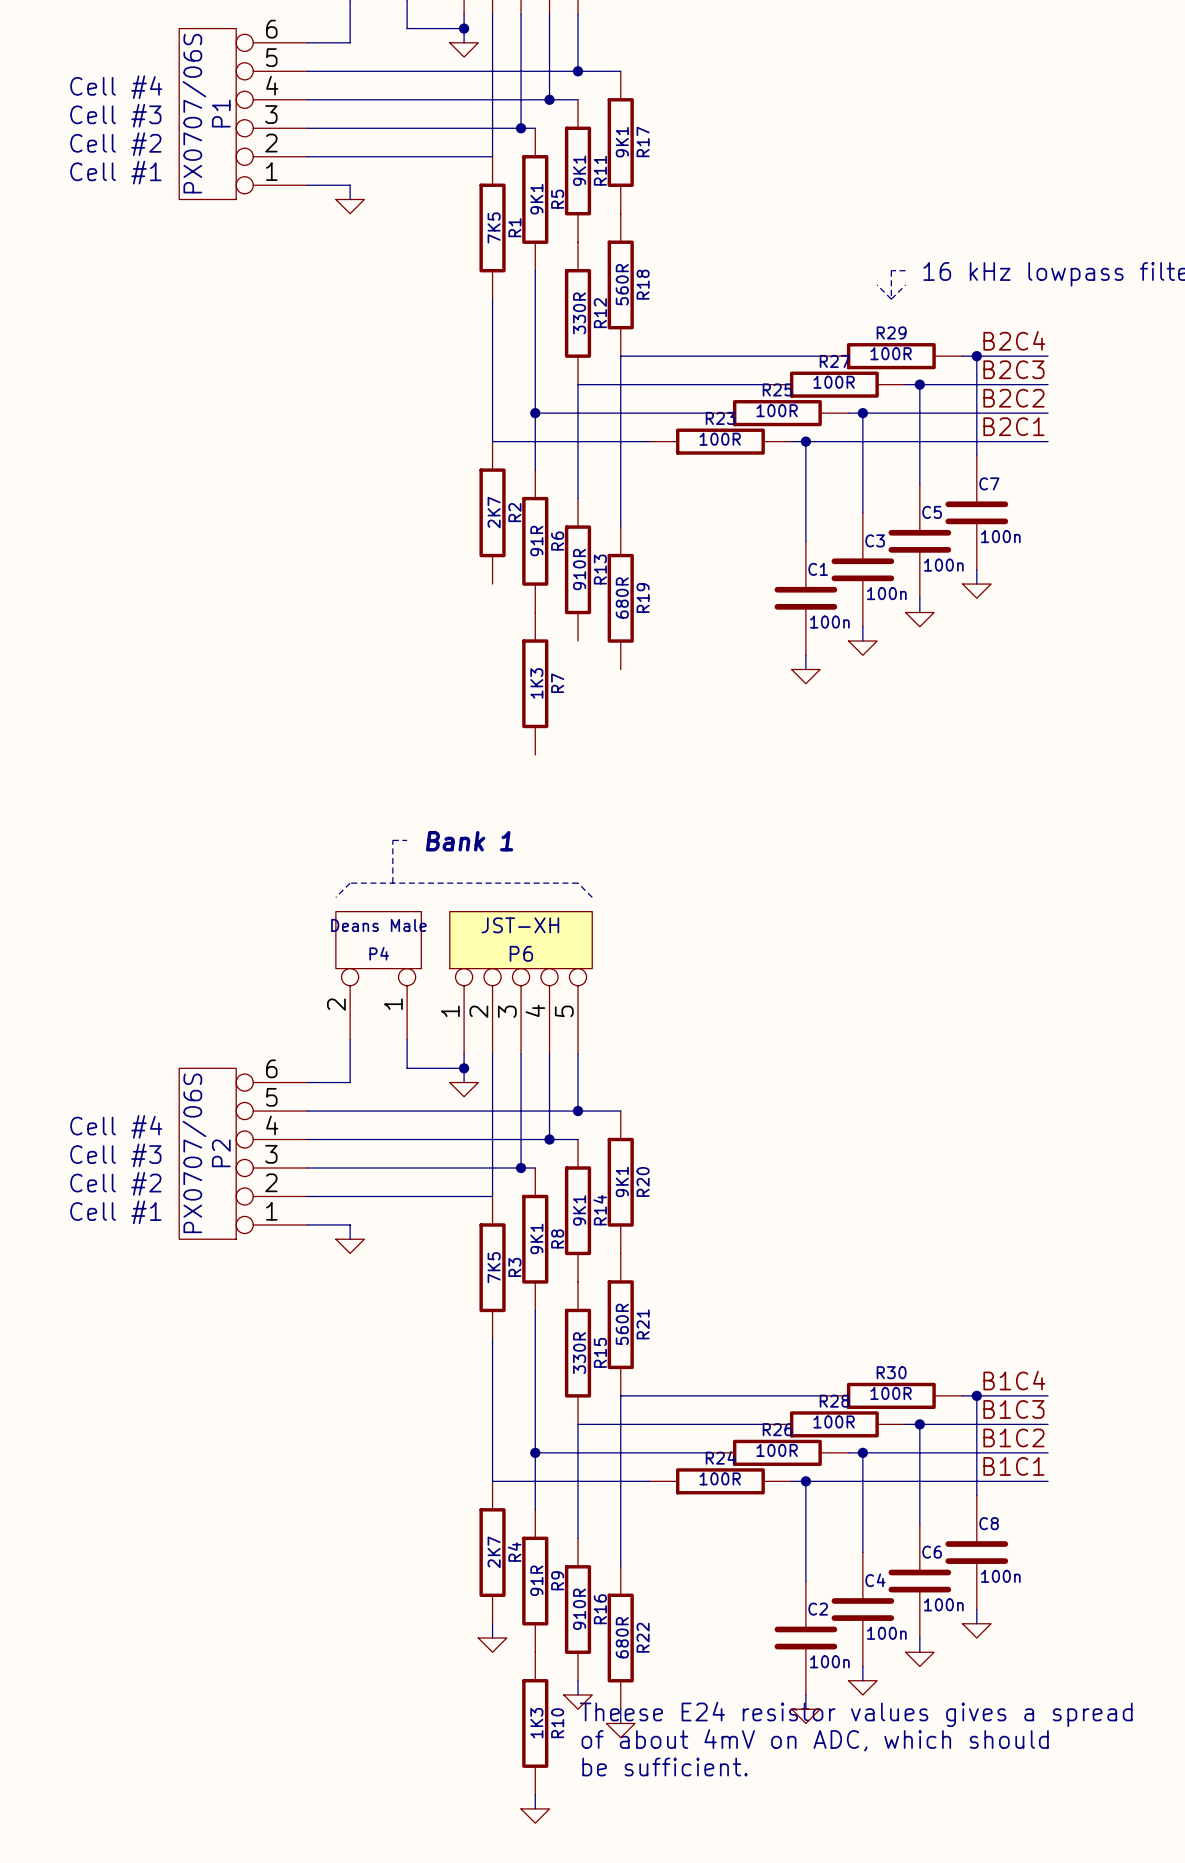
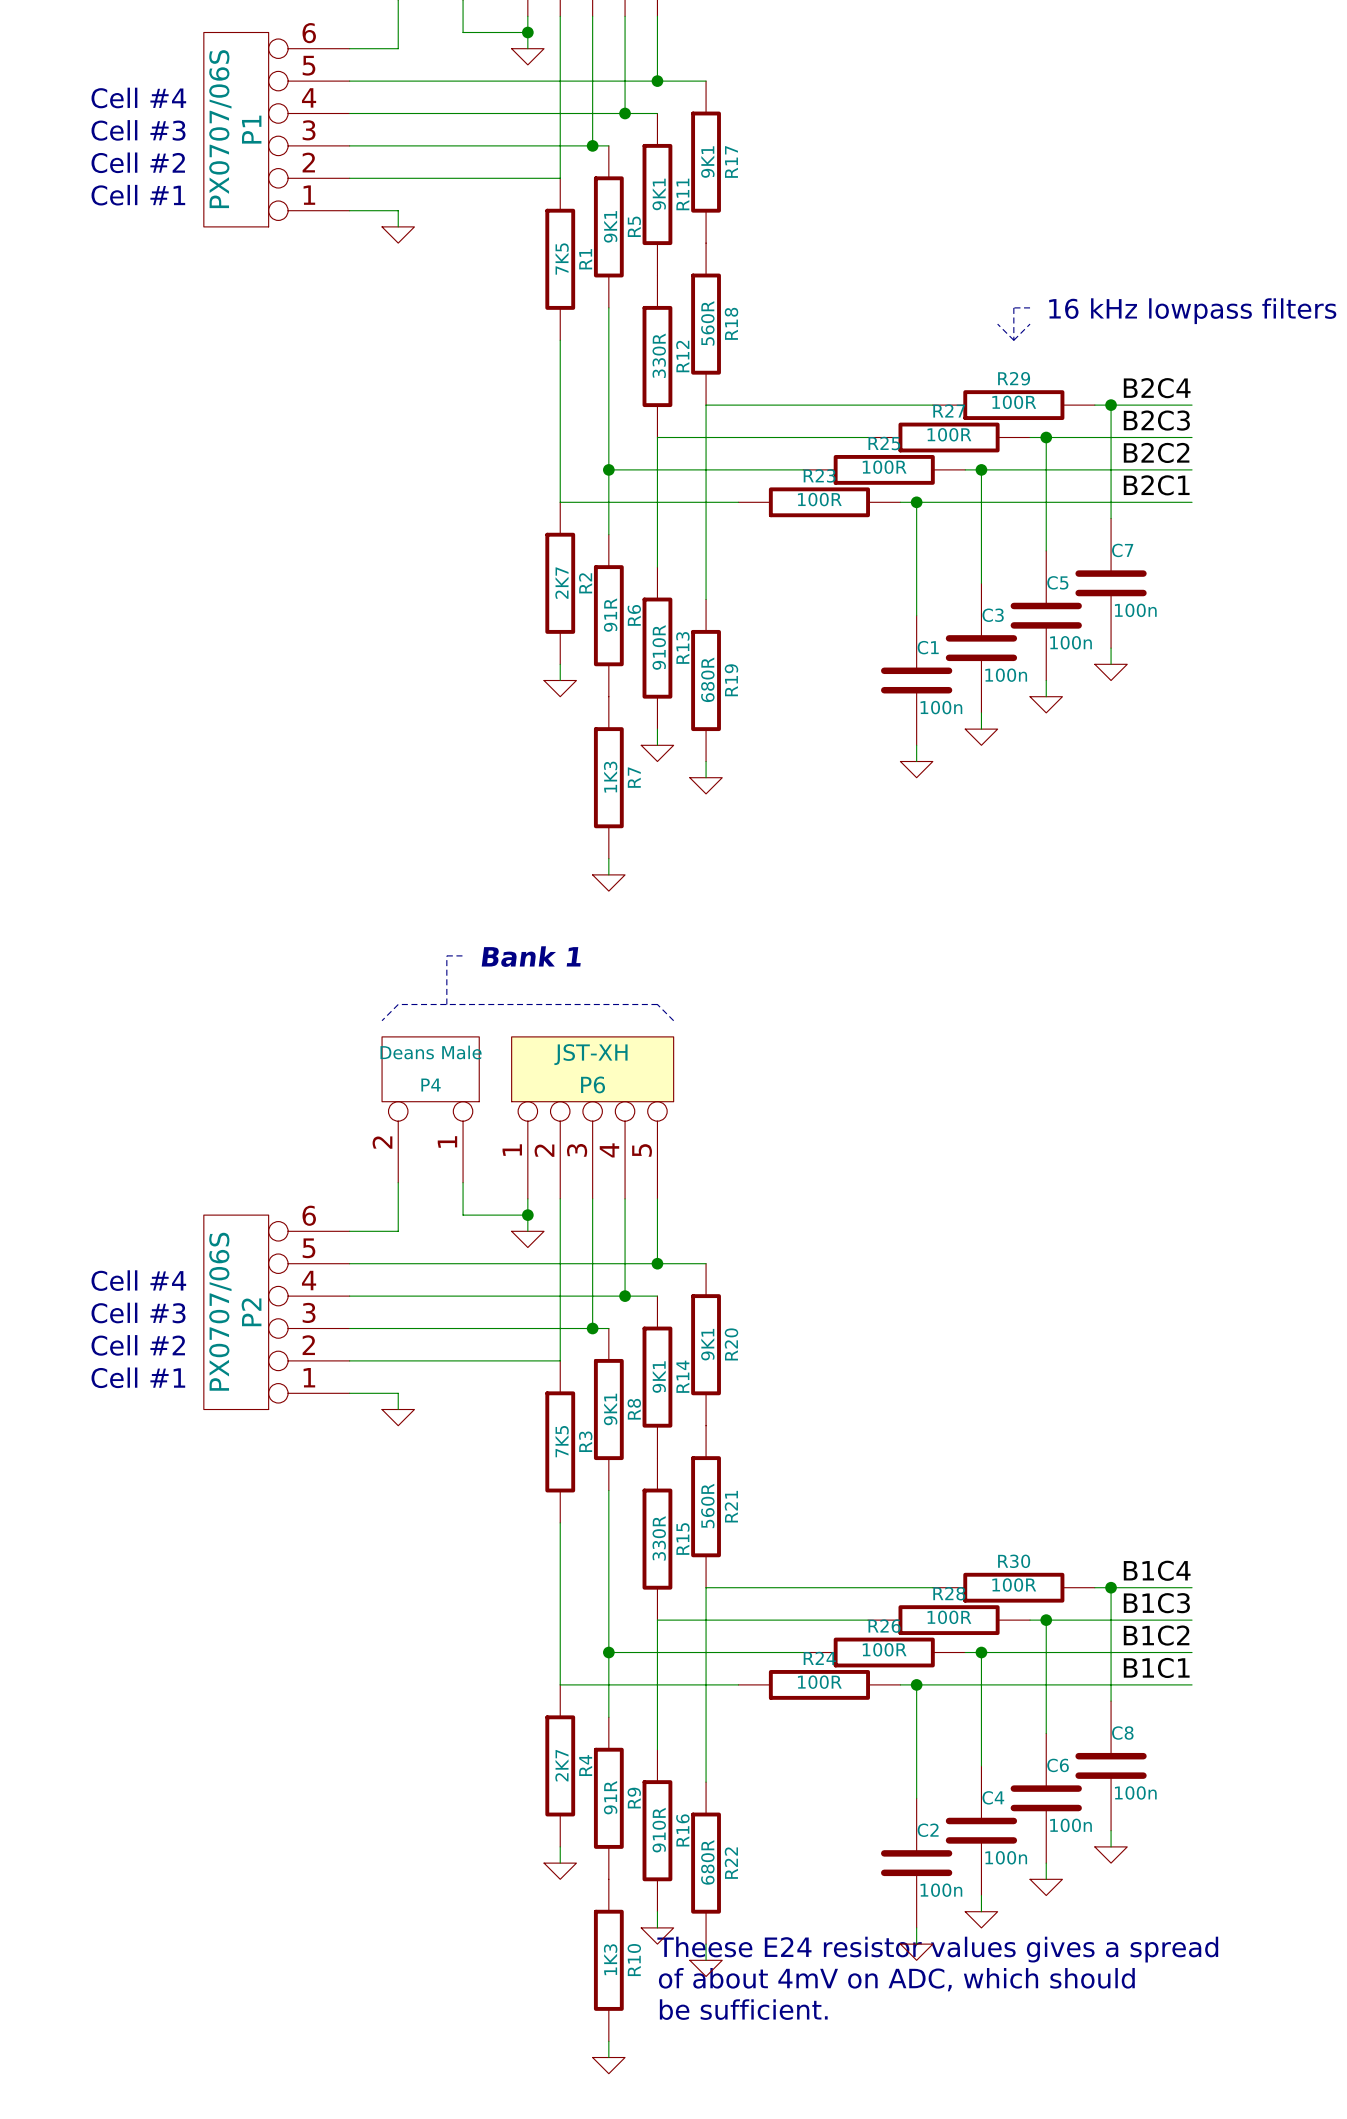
wire: none -> (560, 664) (560, 680)
power symbol: none -> (560, 688)
wire: none -> (657, 729) (657, 745)
power symbol: none -> (657, 753)
wire: none -> (706, 761) (706, 777)
power symbol: none -> (706, 785)
wire: none -> (608, 858) (608, 874)
power symbol: none -> (608, 883)

